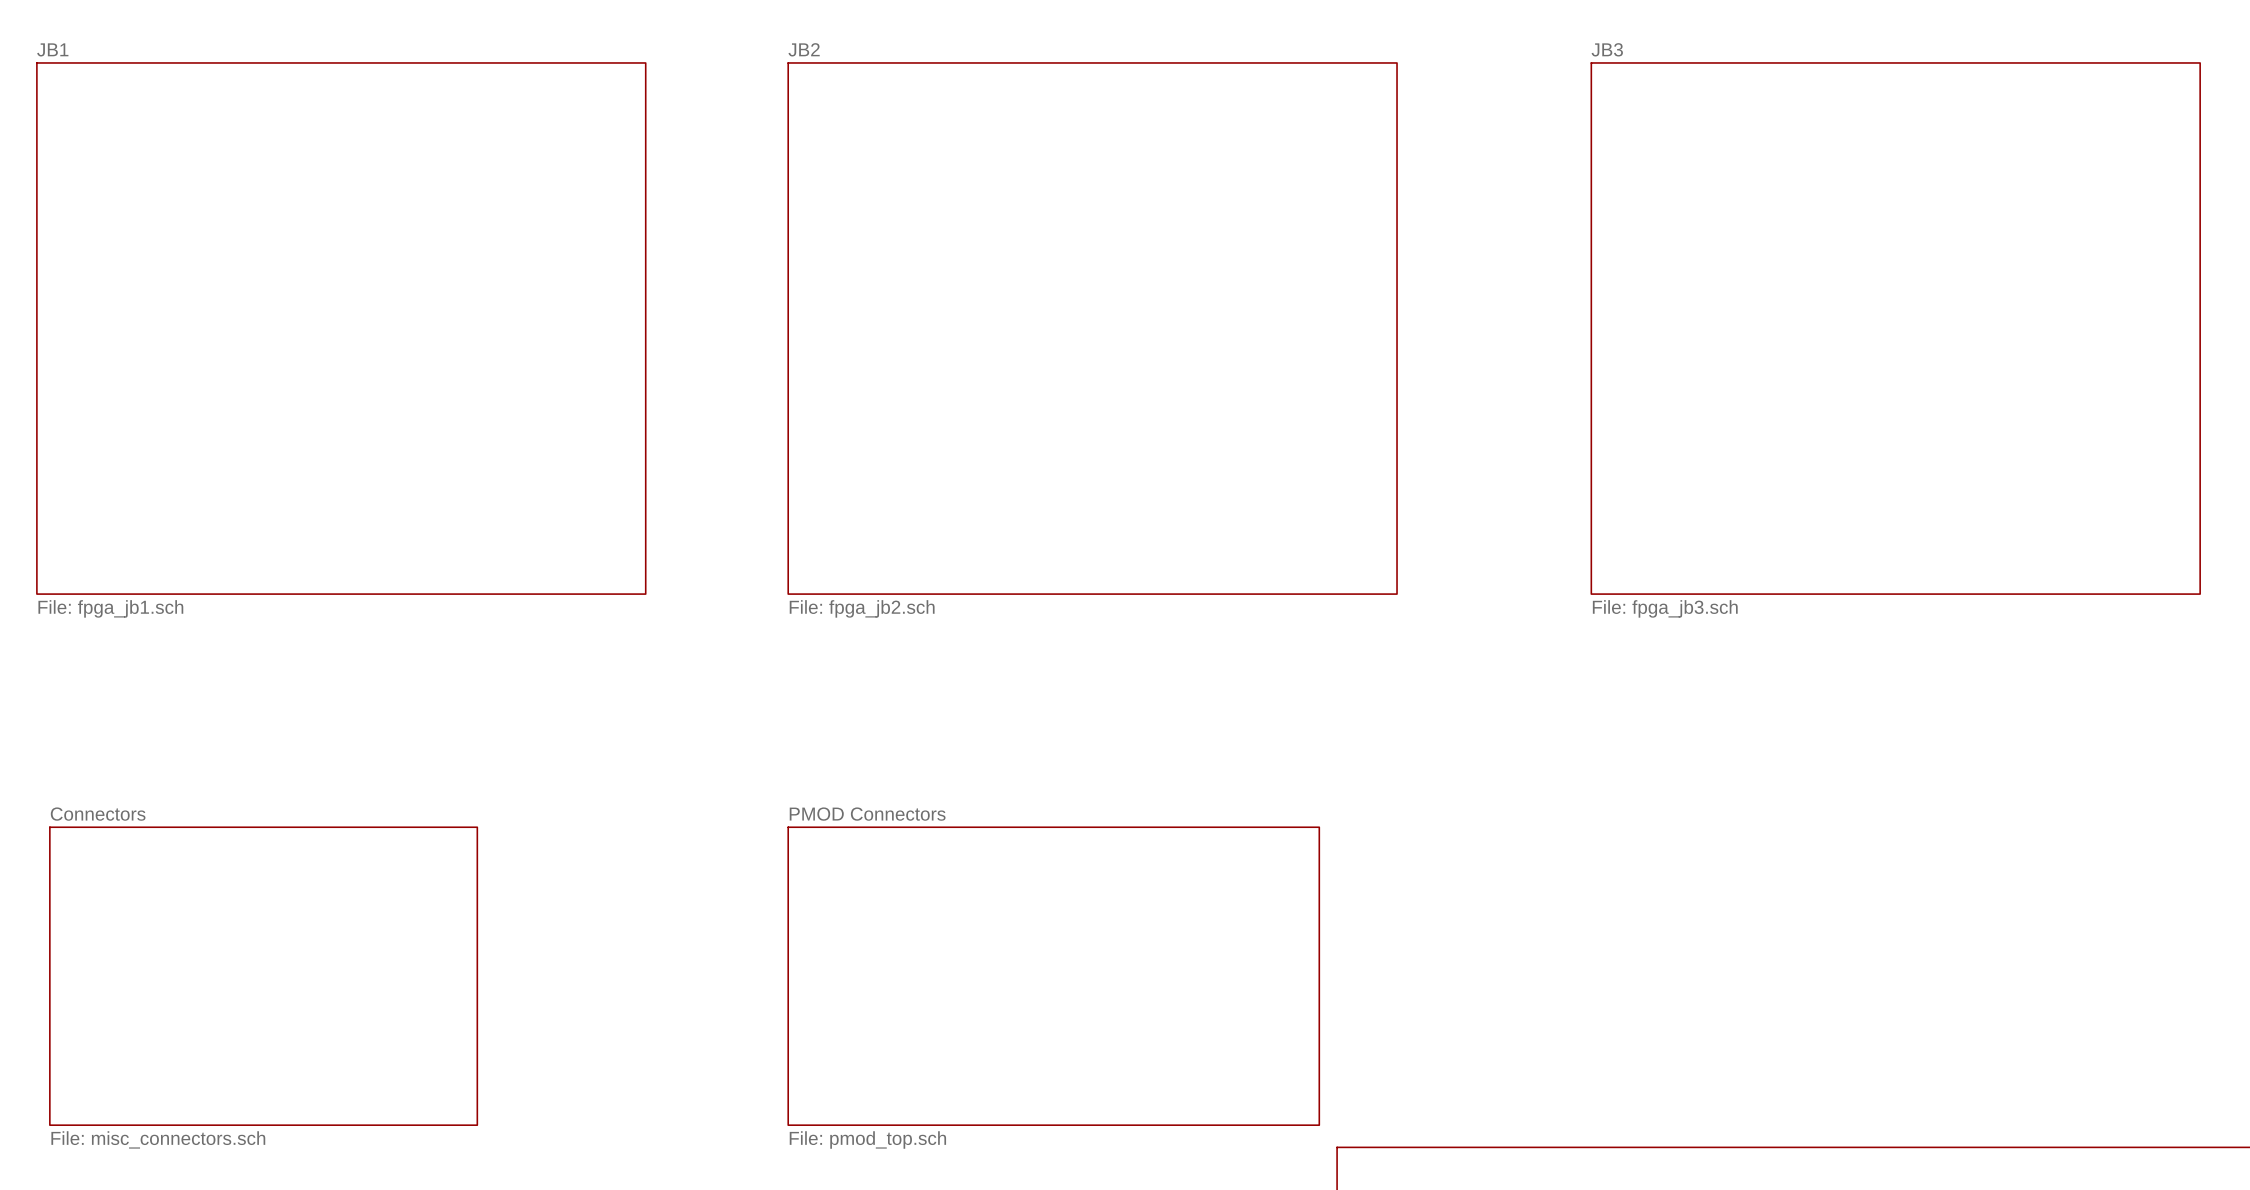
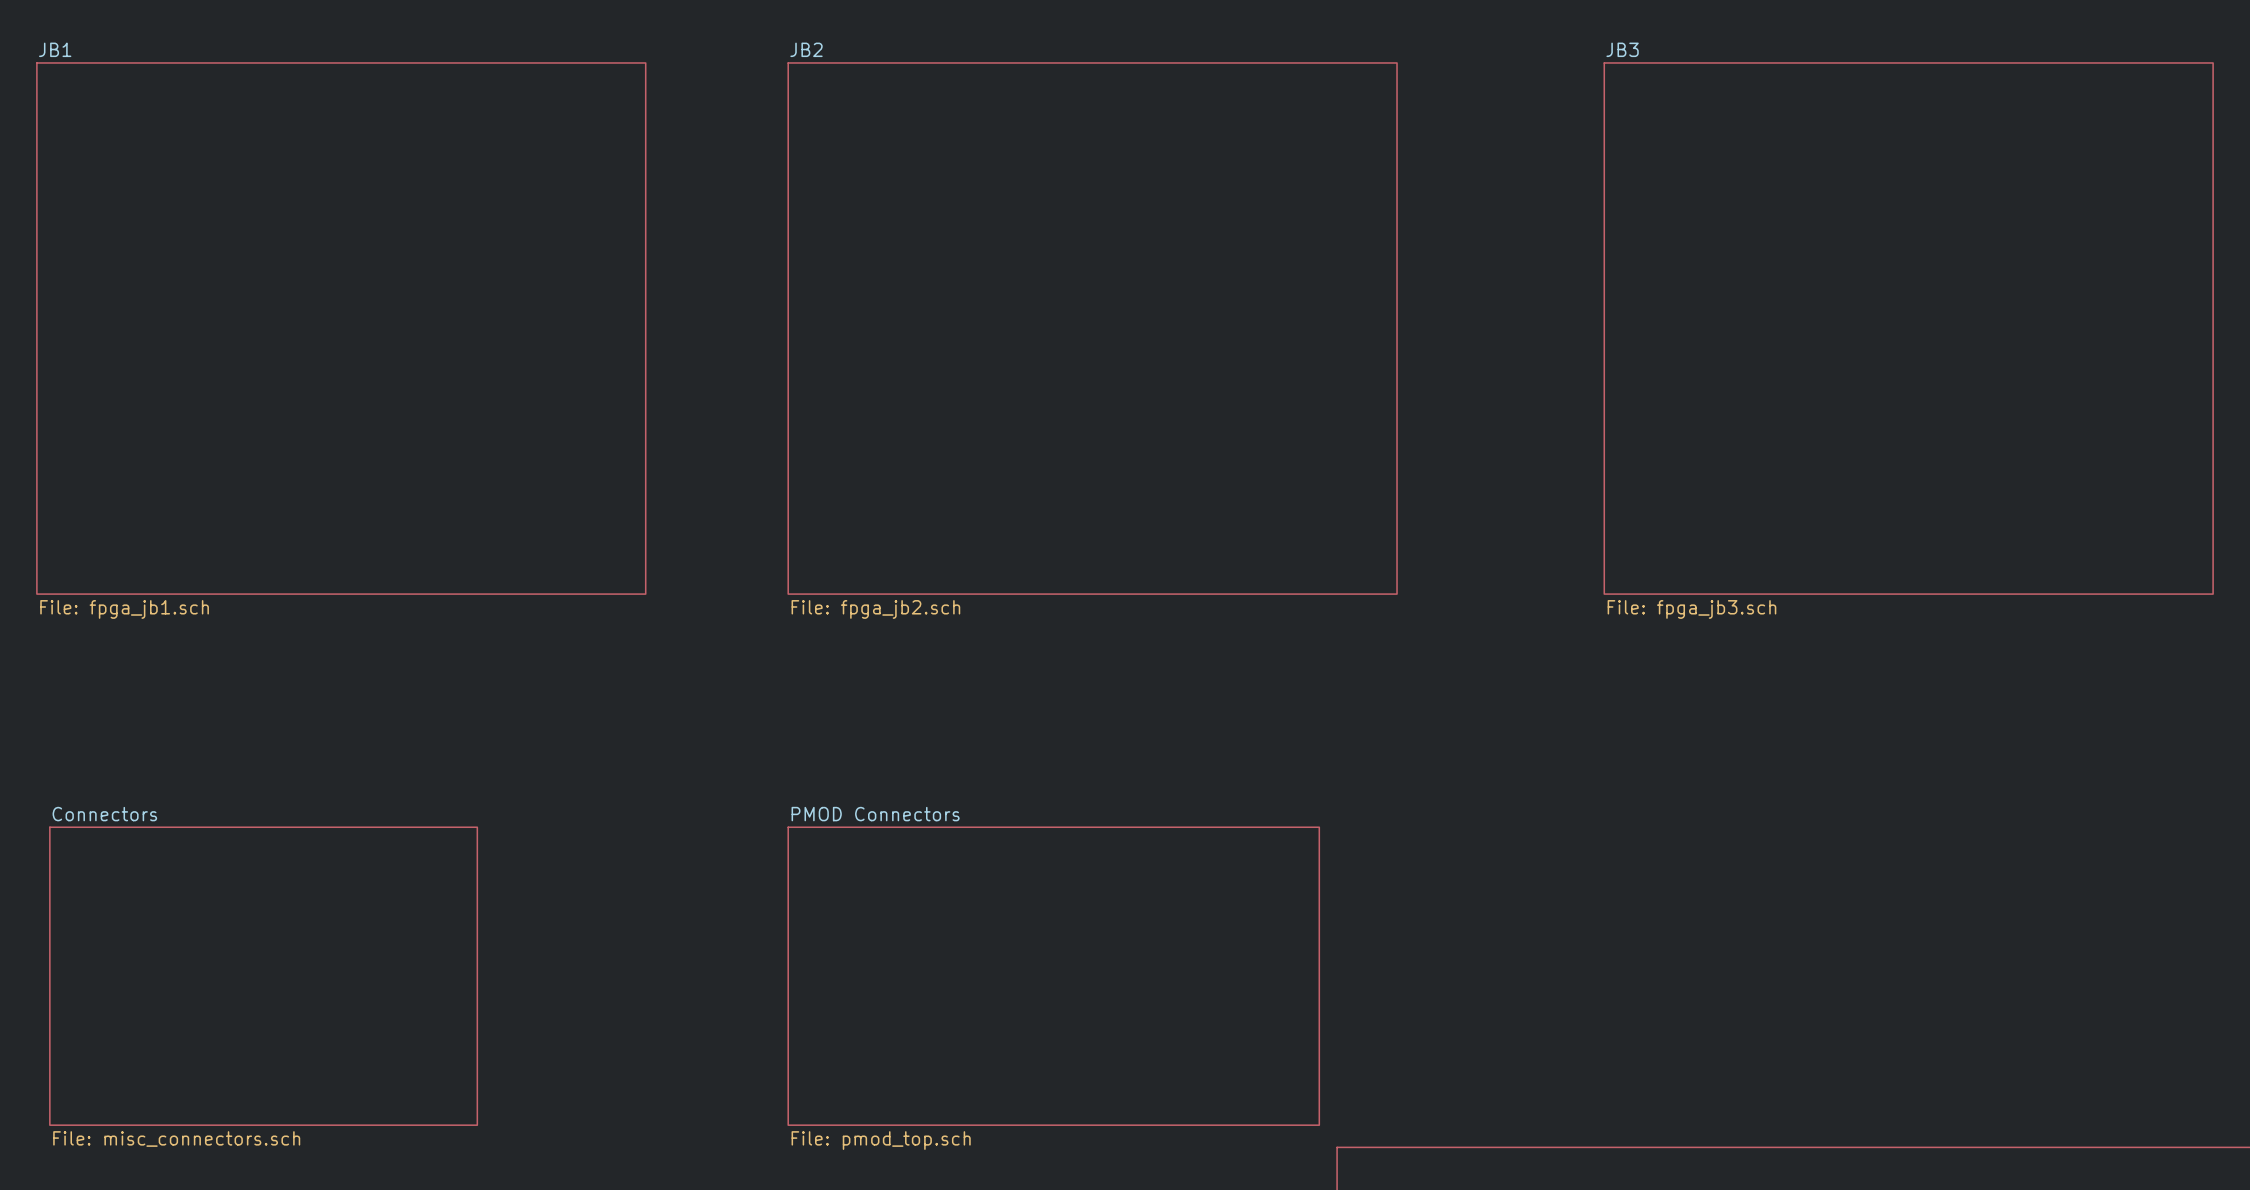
sheet JB3 position: (1895, 328) -> (1908, 328)

